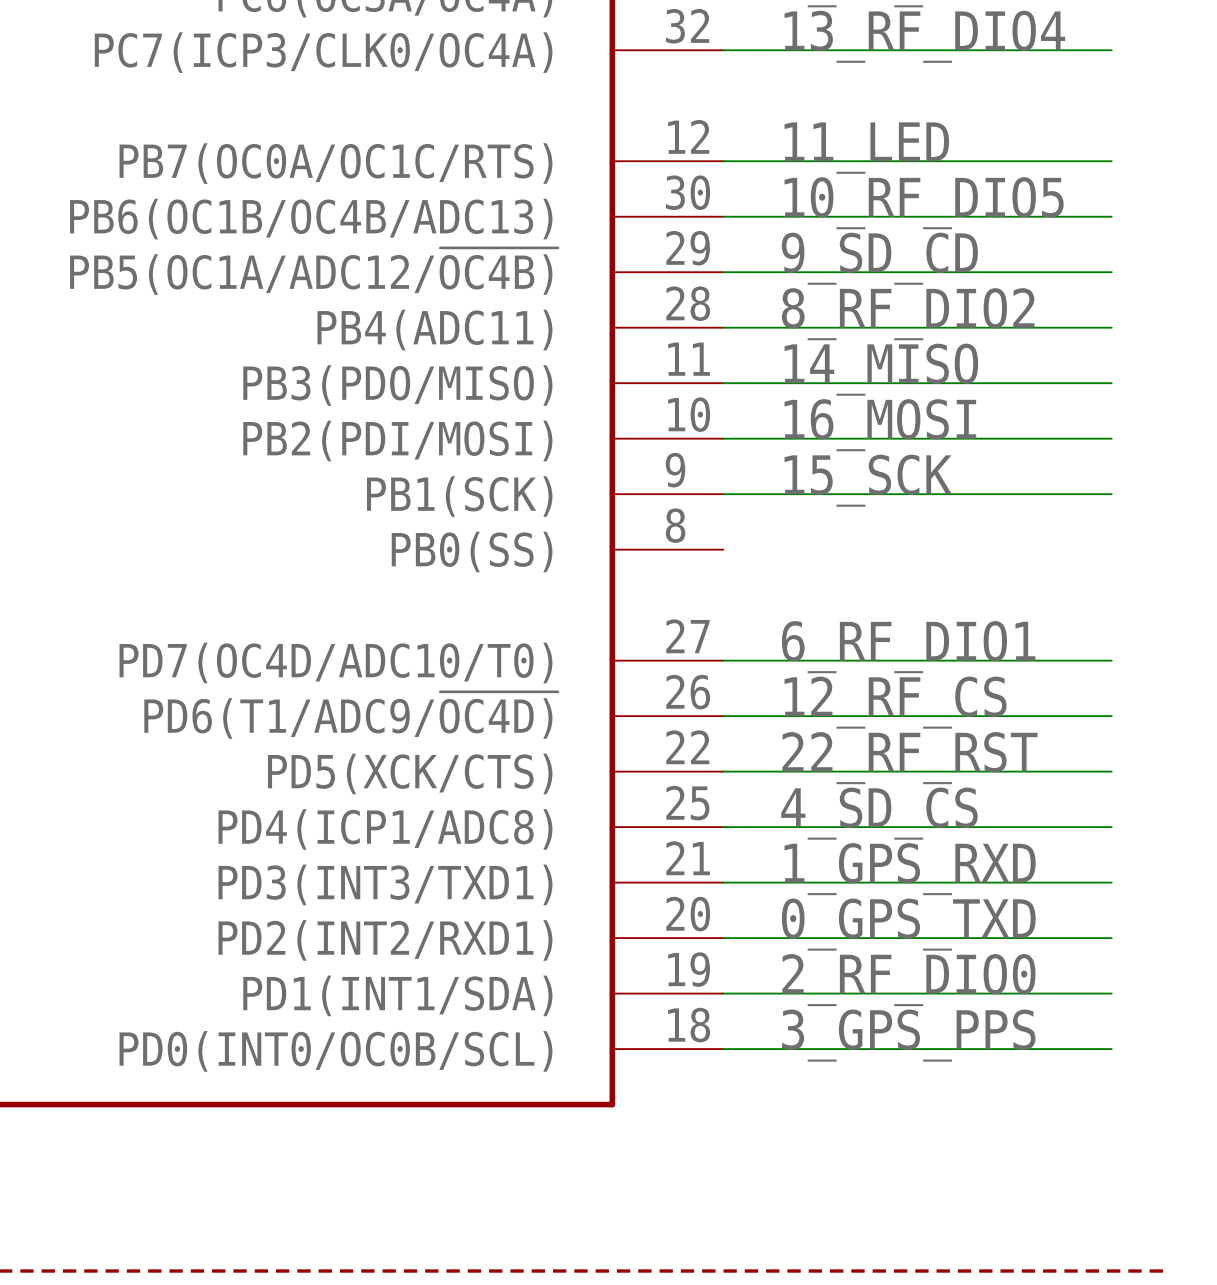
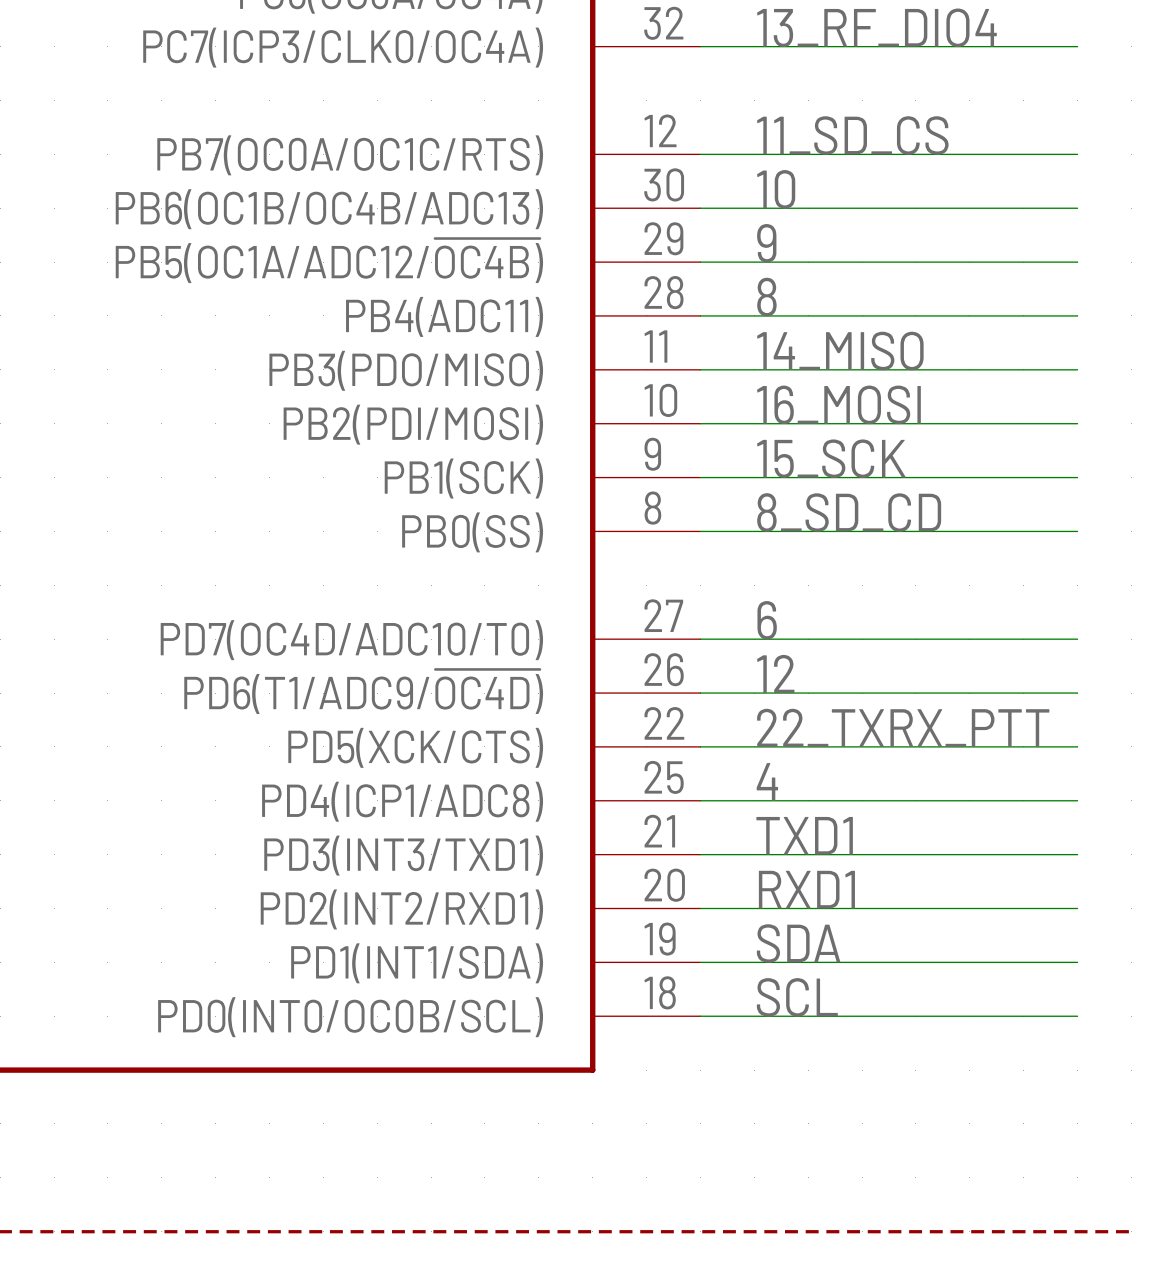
label: 11_LED (866, 148) -> 11_SD_CS (852, 135)
label: 10_RF_DIO5 (924, 203) -> 10 (776, 189)
label: 9_SD_CD (879, 258) -> 9 (766, 243)
label: 8_RF_DIO2 (908, 314) -> 8 (766, 297)
label: none -> 8_SD_CD (849, 512)
wire: none -> (700, 531) (1077, 531)
label: 6_RF_DIO1 (908, 647) -> 6 (767, 620)
label: 12_RF_CS (895, 702) -> 12 (775, 673)
label: 22_RF_RST (909, 758) -> 22_TXRX_PTT (903, 727)
label: 4_SD_CS (879, 813) -> 4 (767, 781)
label: 1_GPS_RXD (910, 869) -> TXD1 (804, 835)
label: 0_GPS_TXD (908, 924) -> RXD1 (806, 889)
label: 2_RF_DIO0 (908, 980) -> SDA (798, 943)
label: 3_GPS_PPS (908, 1035) -> SCL (797, 997)

